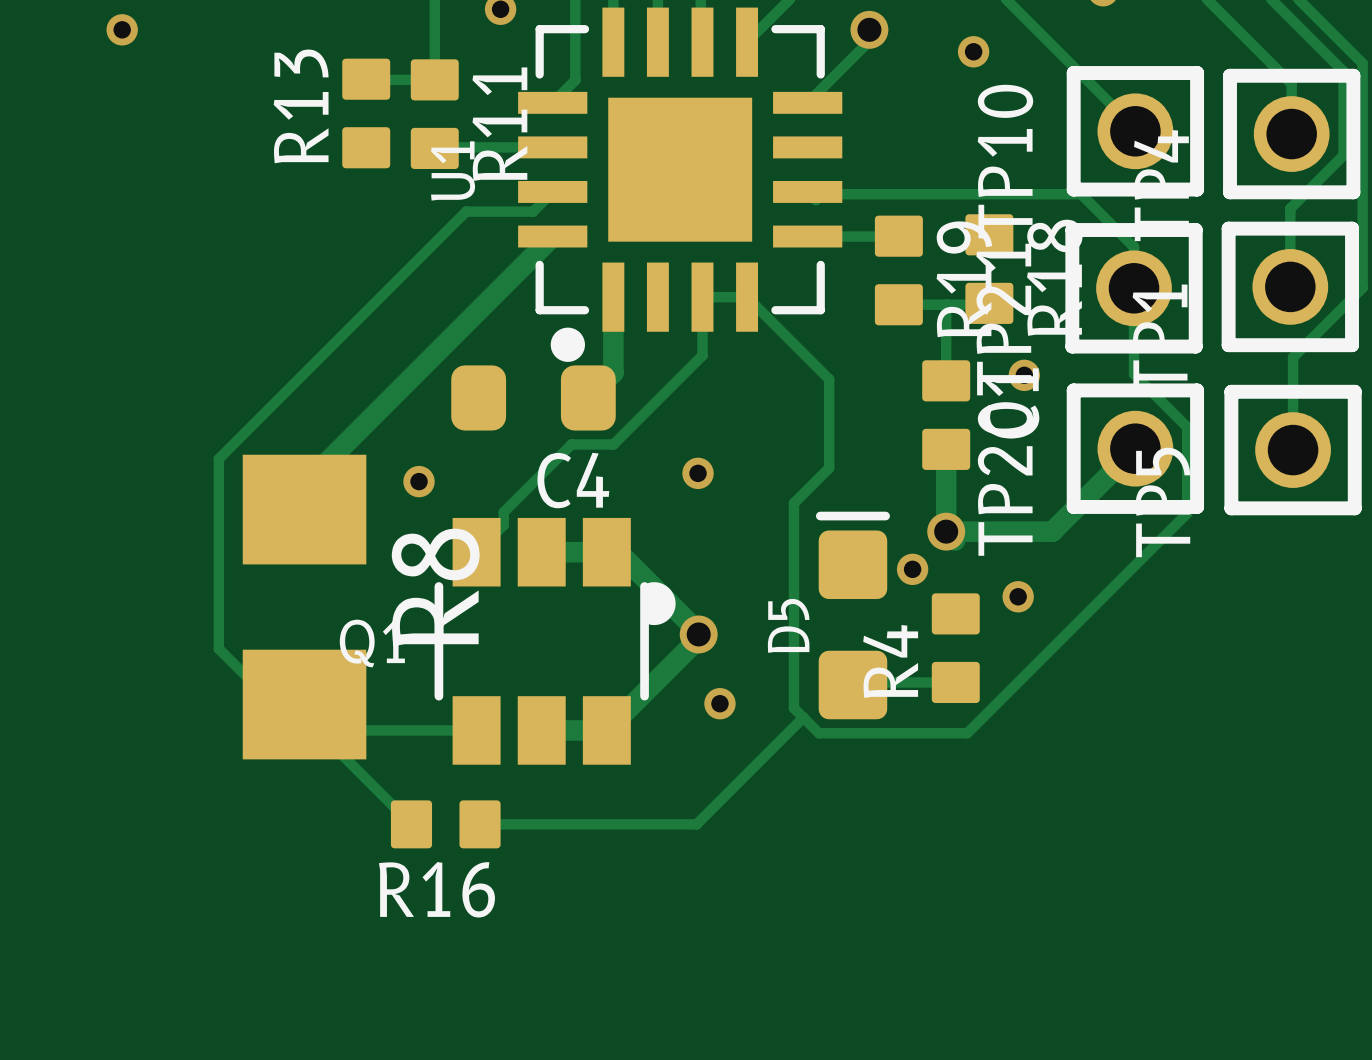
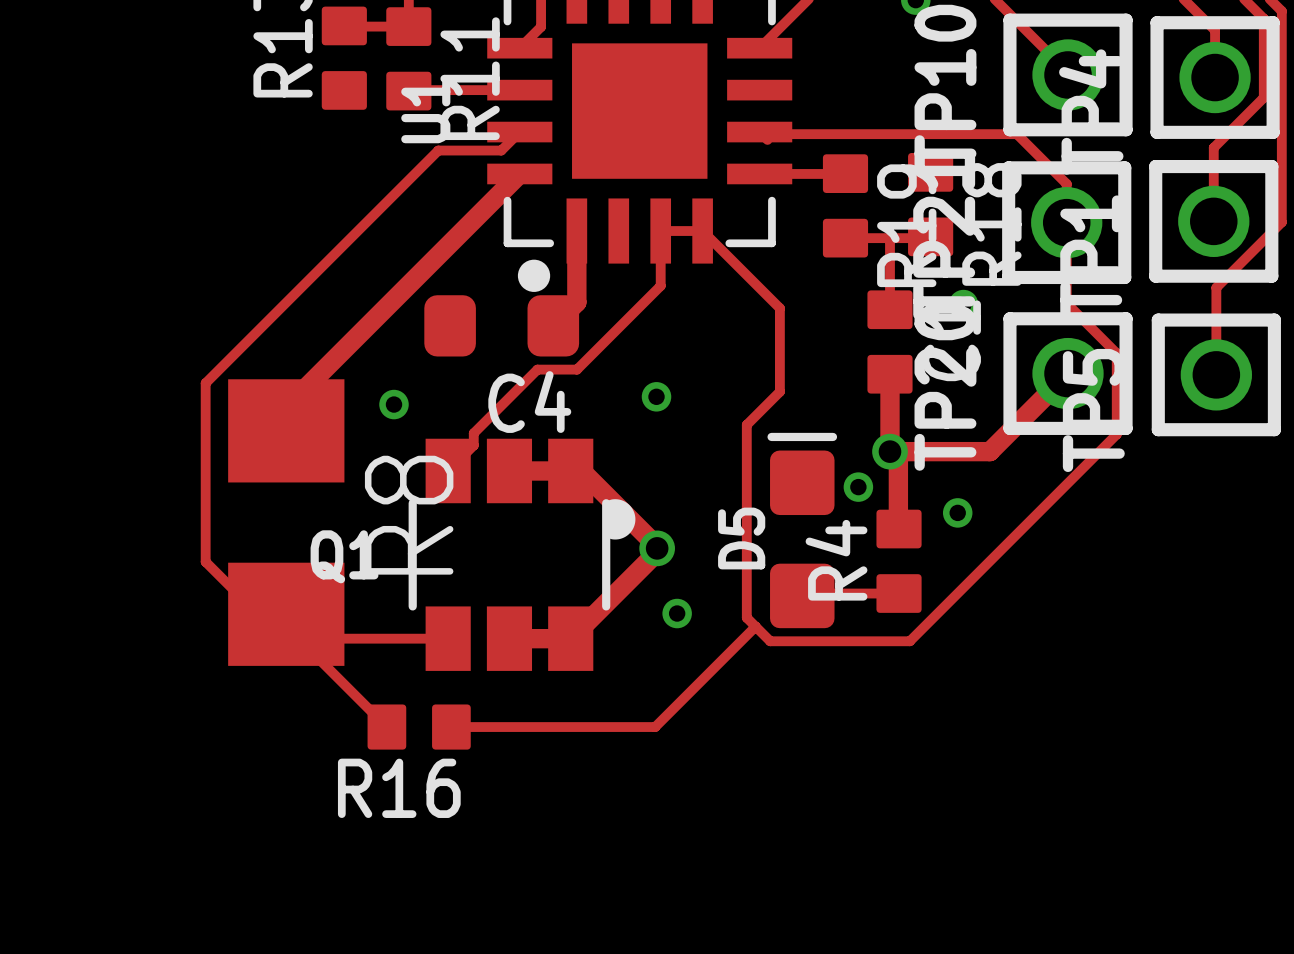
track: none -> (898, 460) (898, 528)

